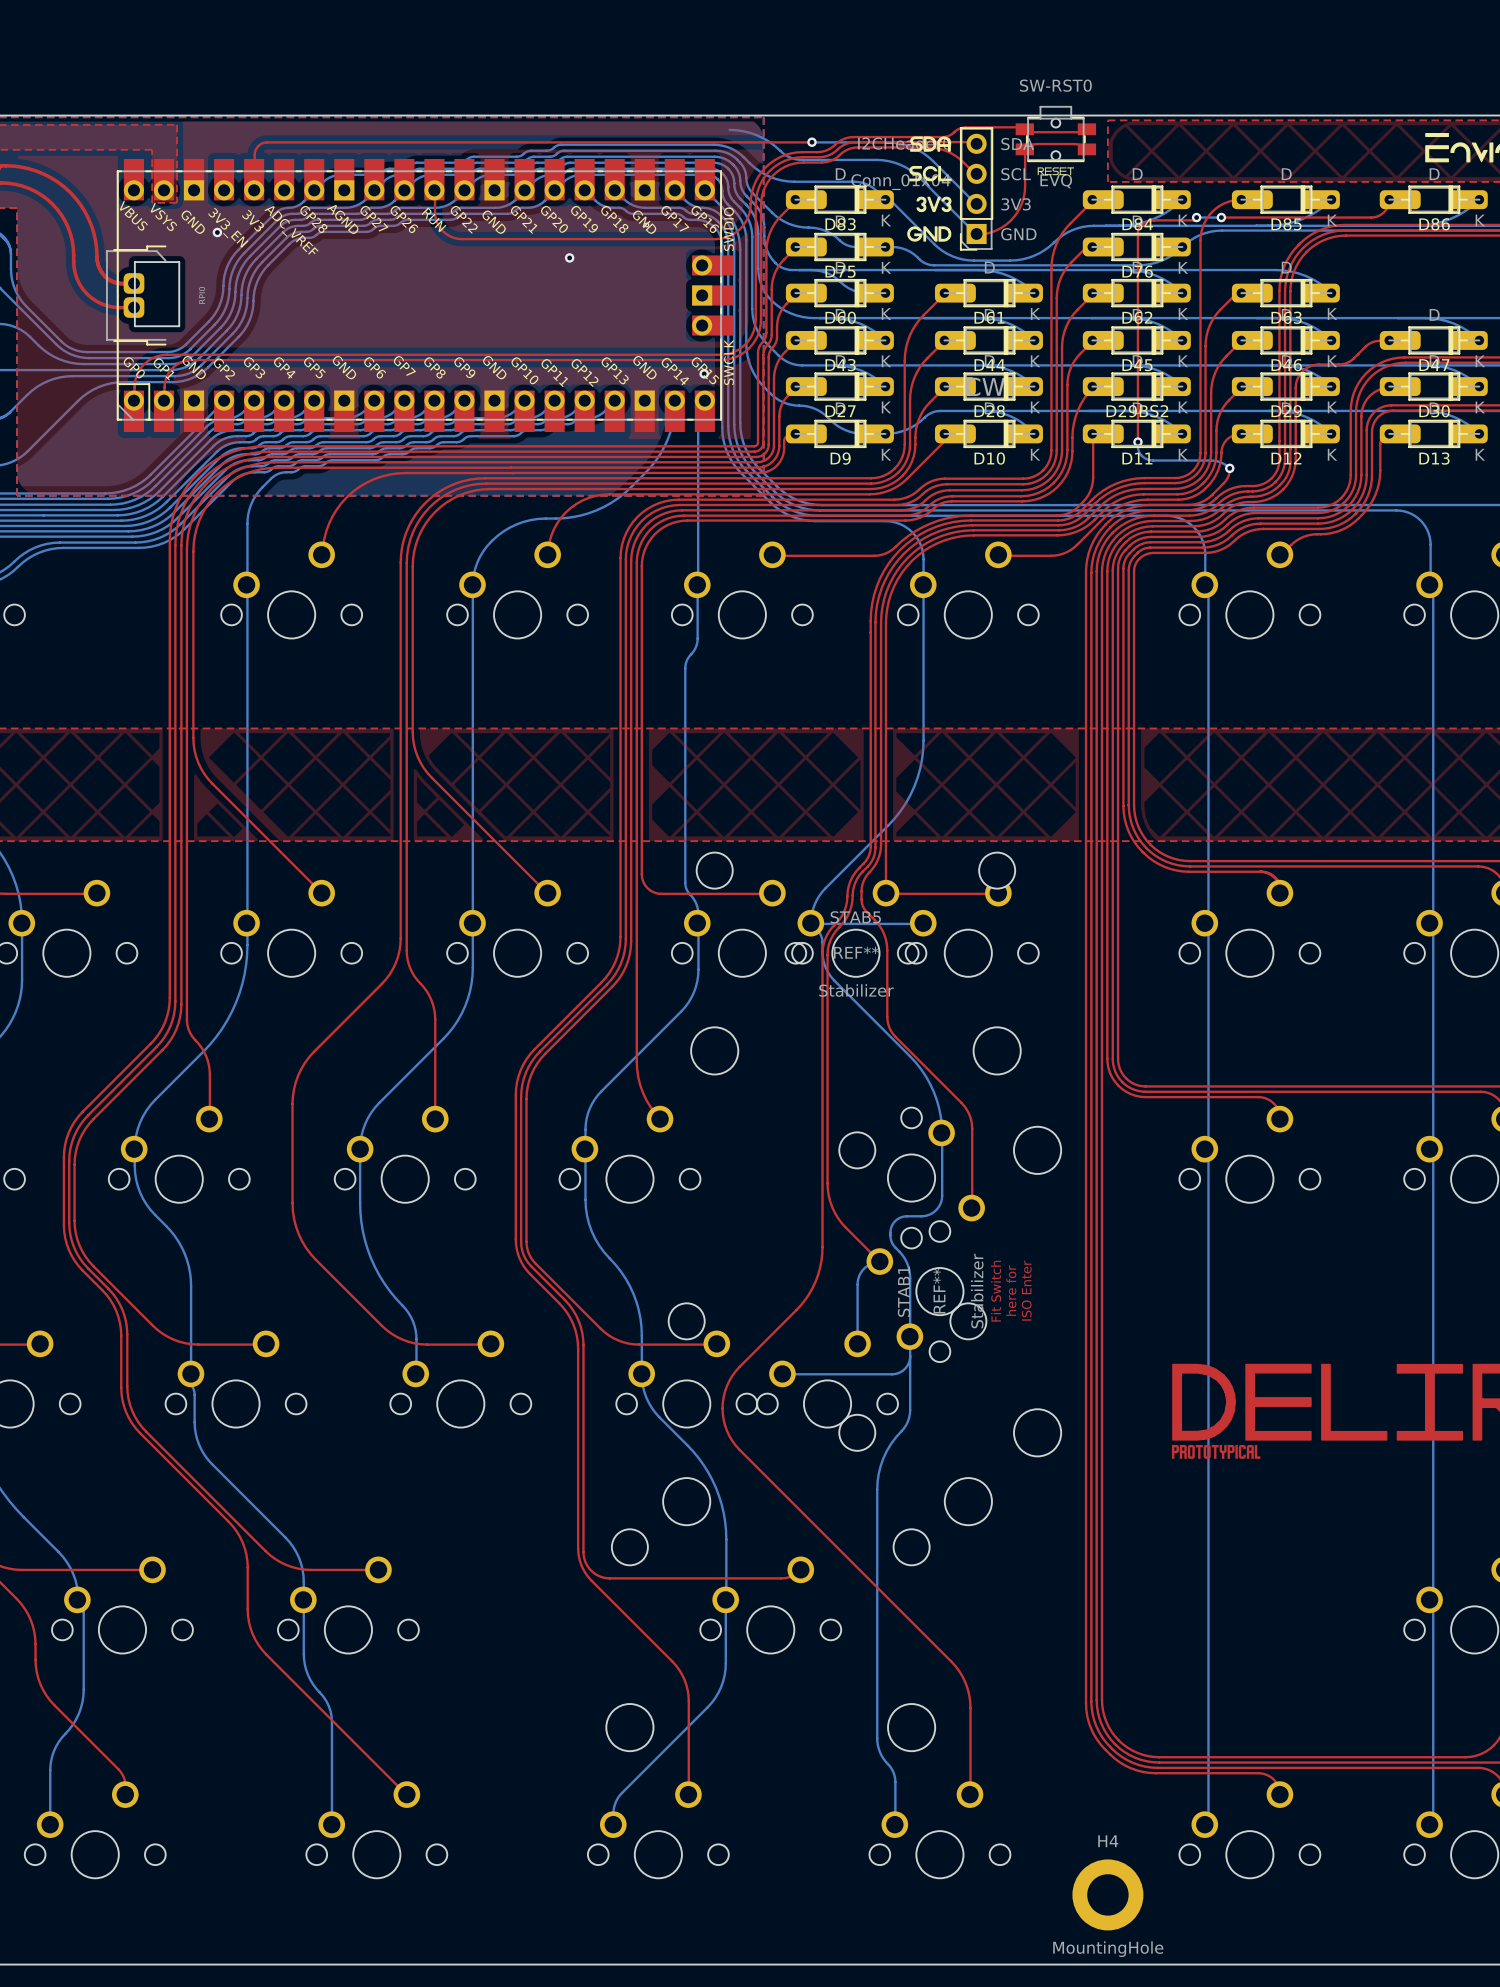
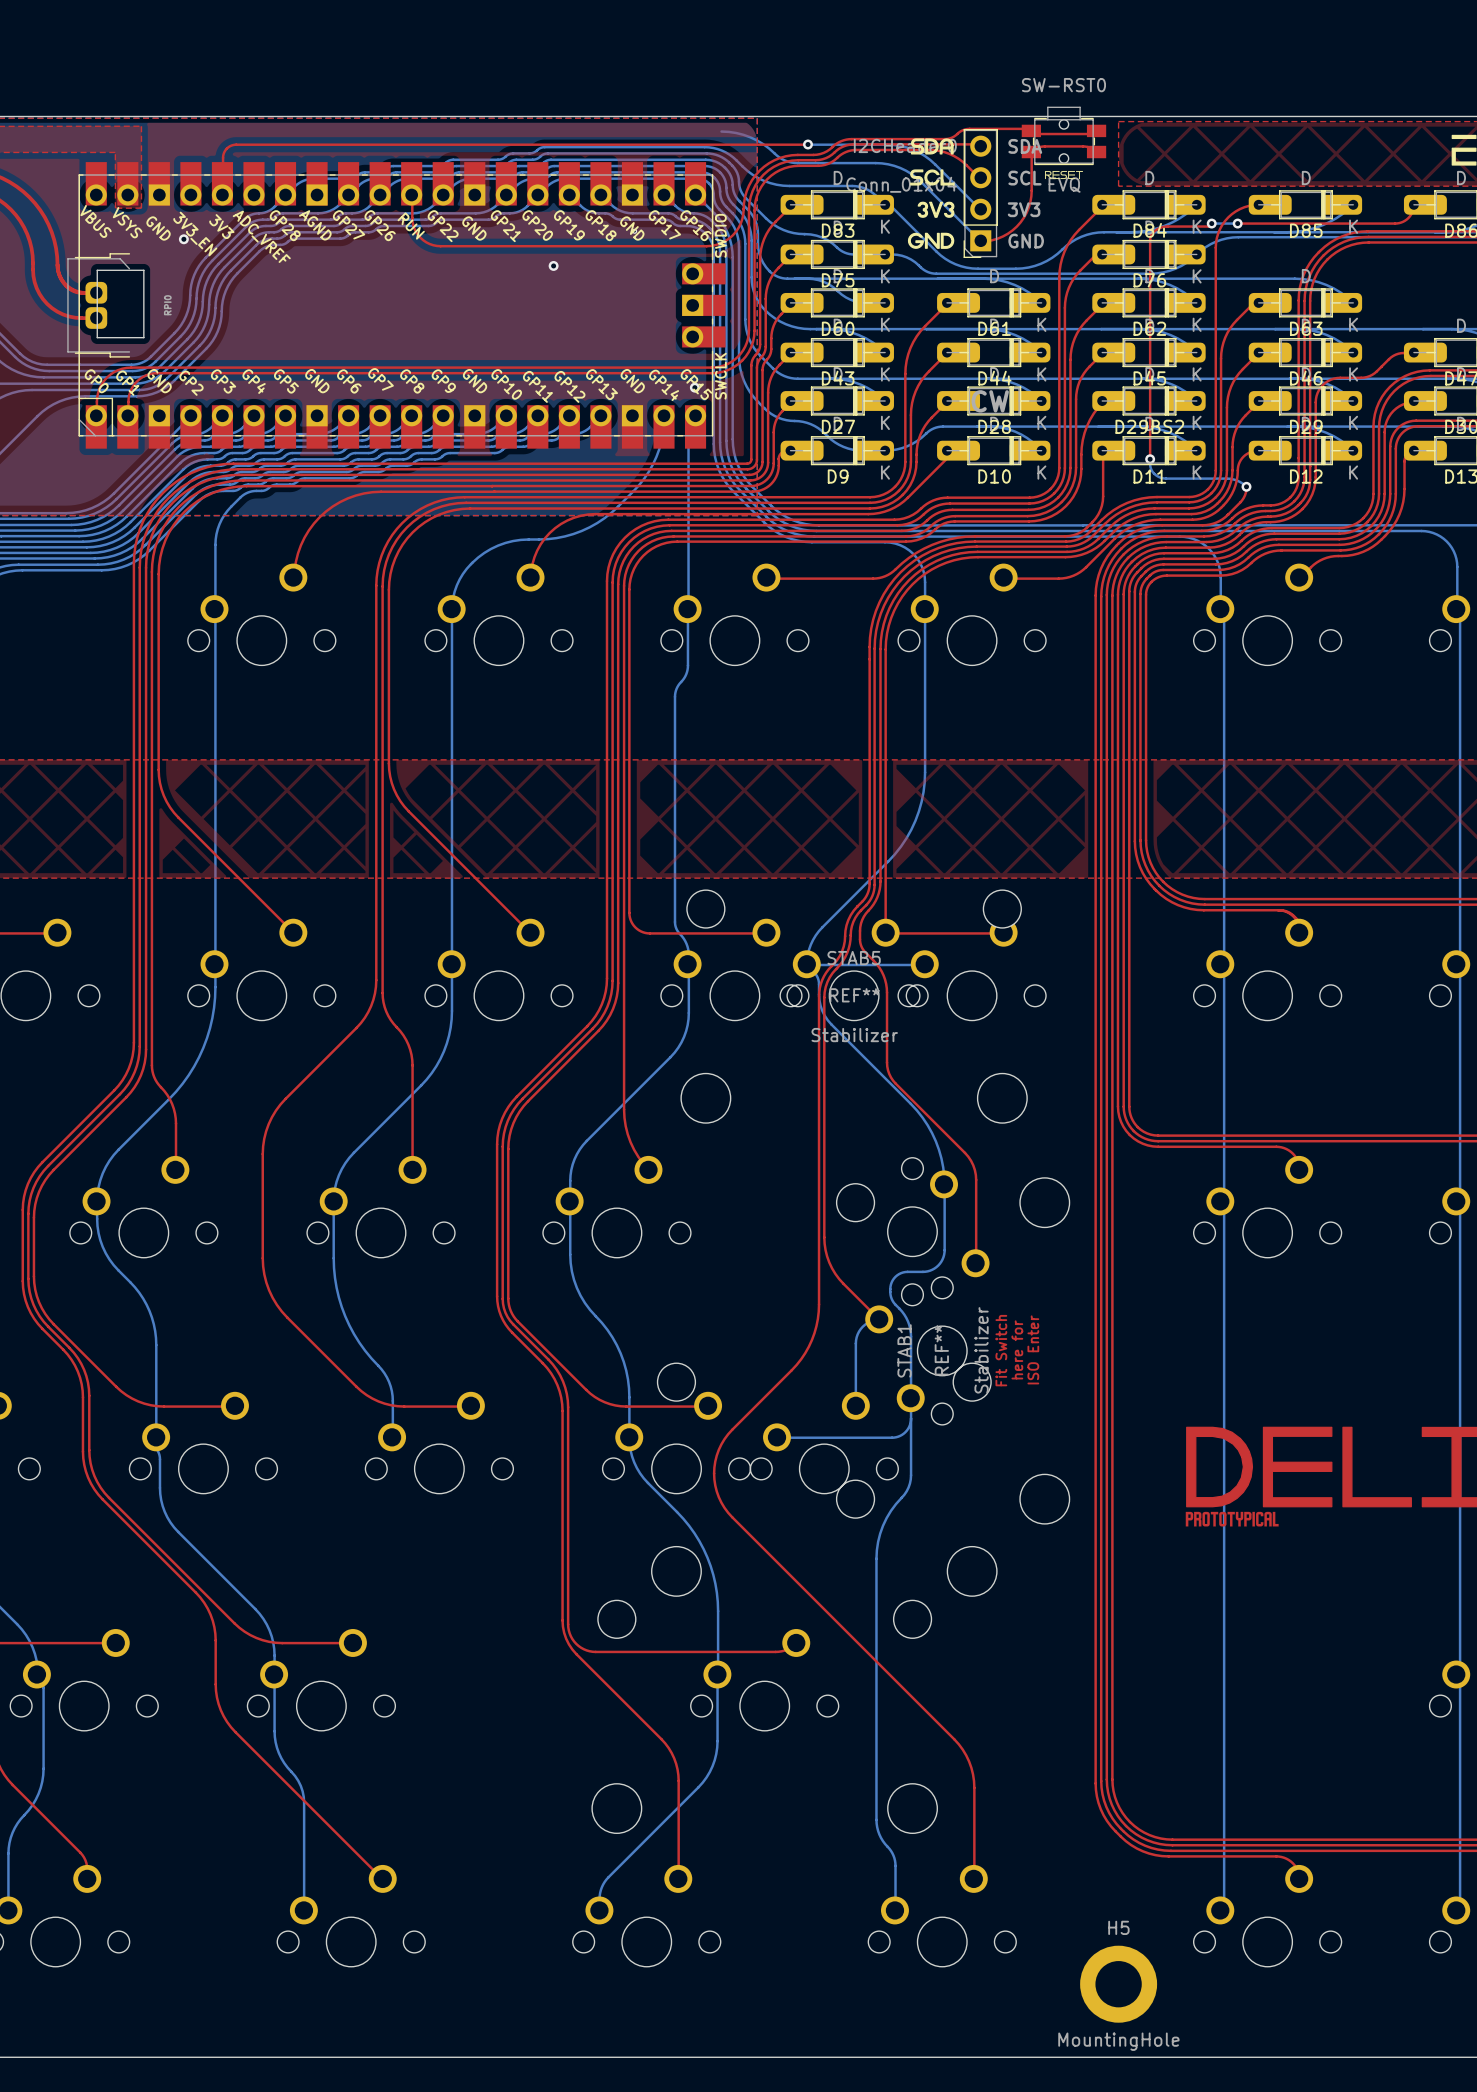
H4: MountingHole (1107, 1894) -> none
H5: none -> MountingHole (1118, 1984)

